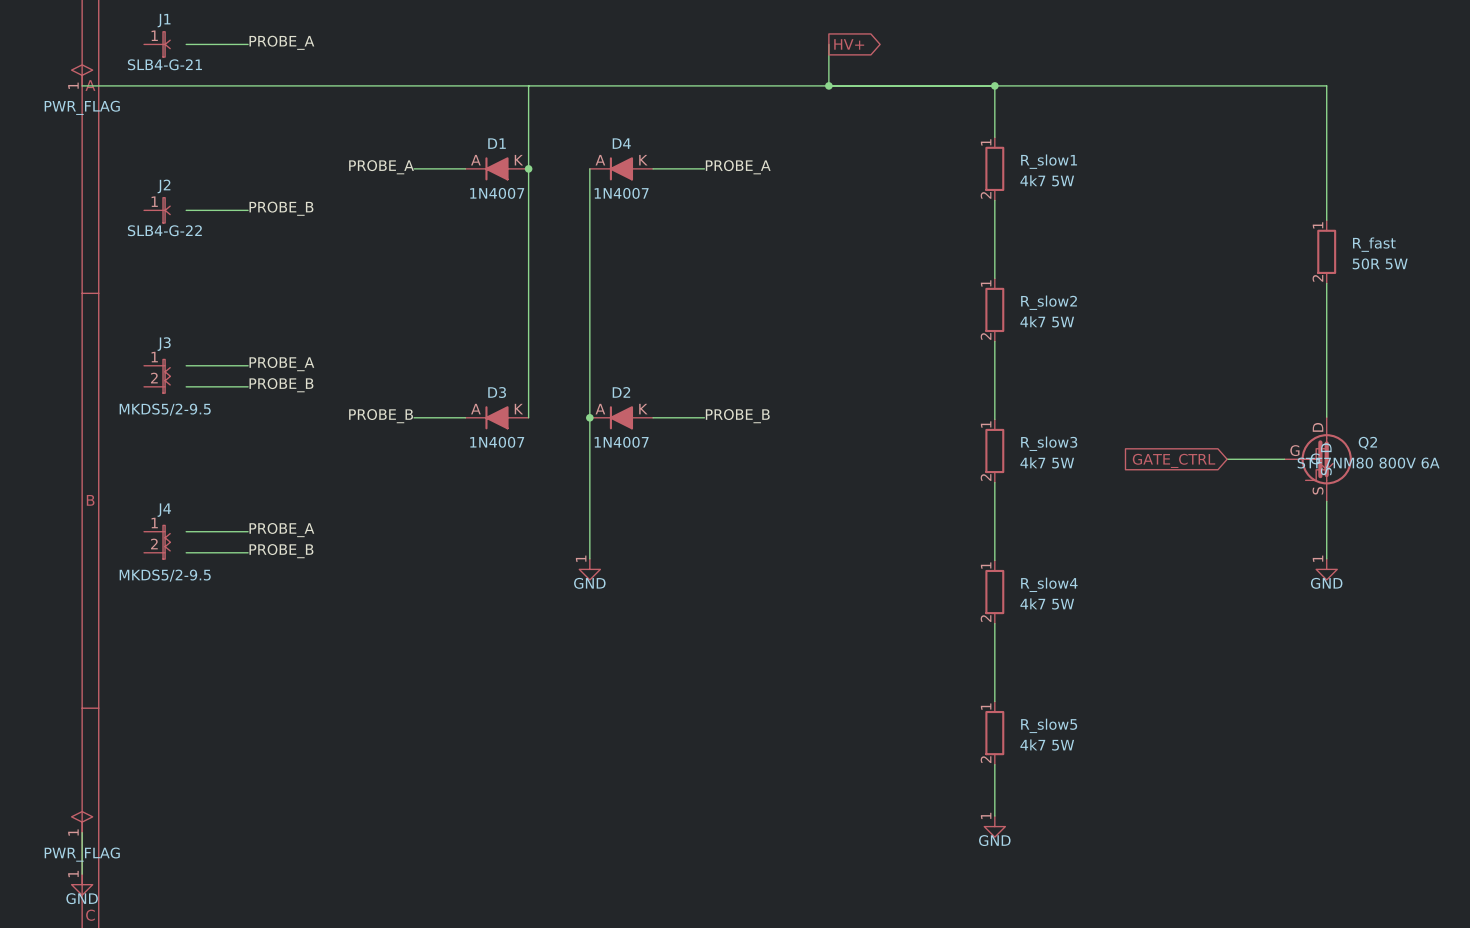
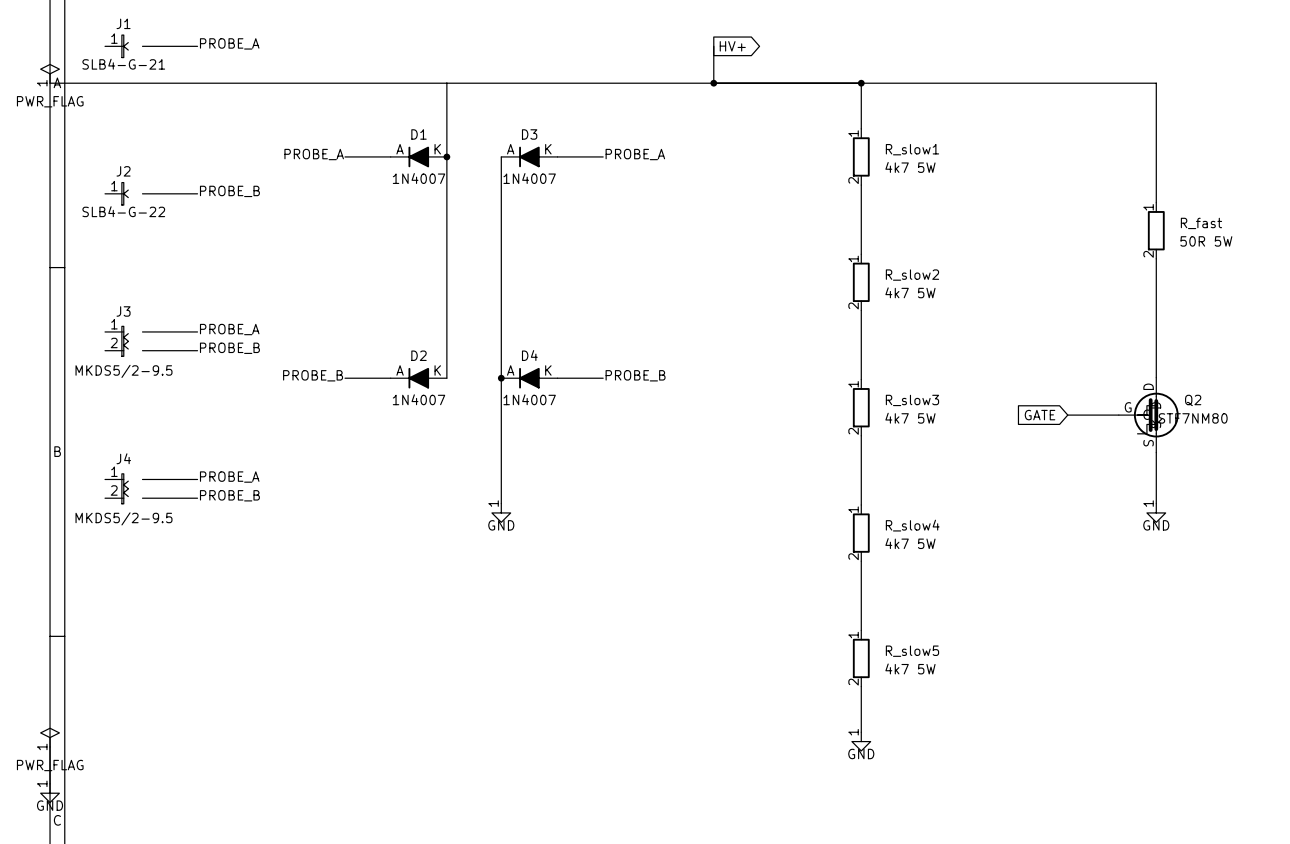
D4 name: D4 (621, 143) -> D3 (529, 134)
D3 name: D3 (497, 392) -> D2 (419, 355)
D2 name: D2 (621, 392) -> D4 (529, 355)
global label: GATE_CTRL (1174, 460) -> GATE (1040, 415)
Q2 value: STF7NM80 800V 6A (1368, 463) -> STF7NM80 (1193, 418)

